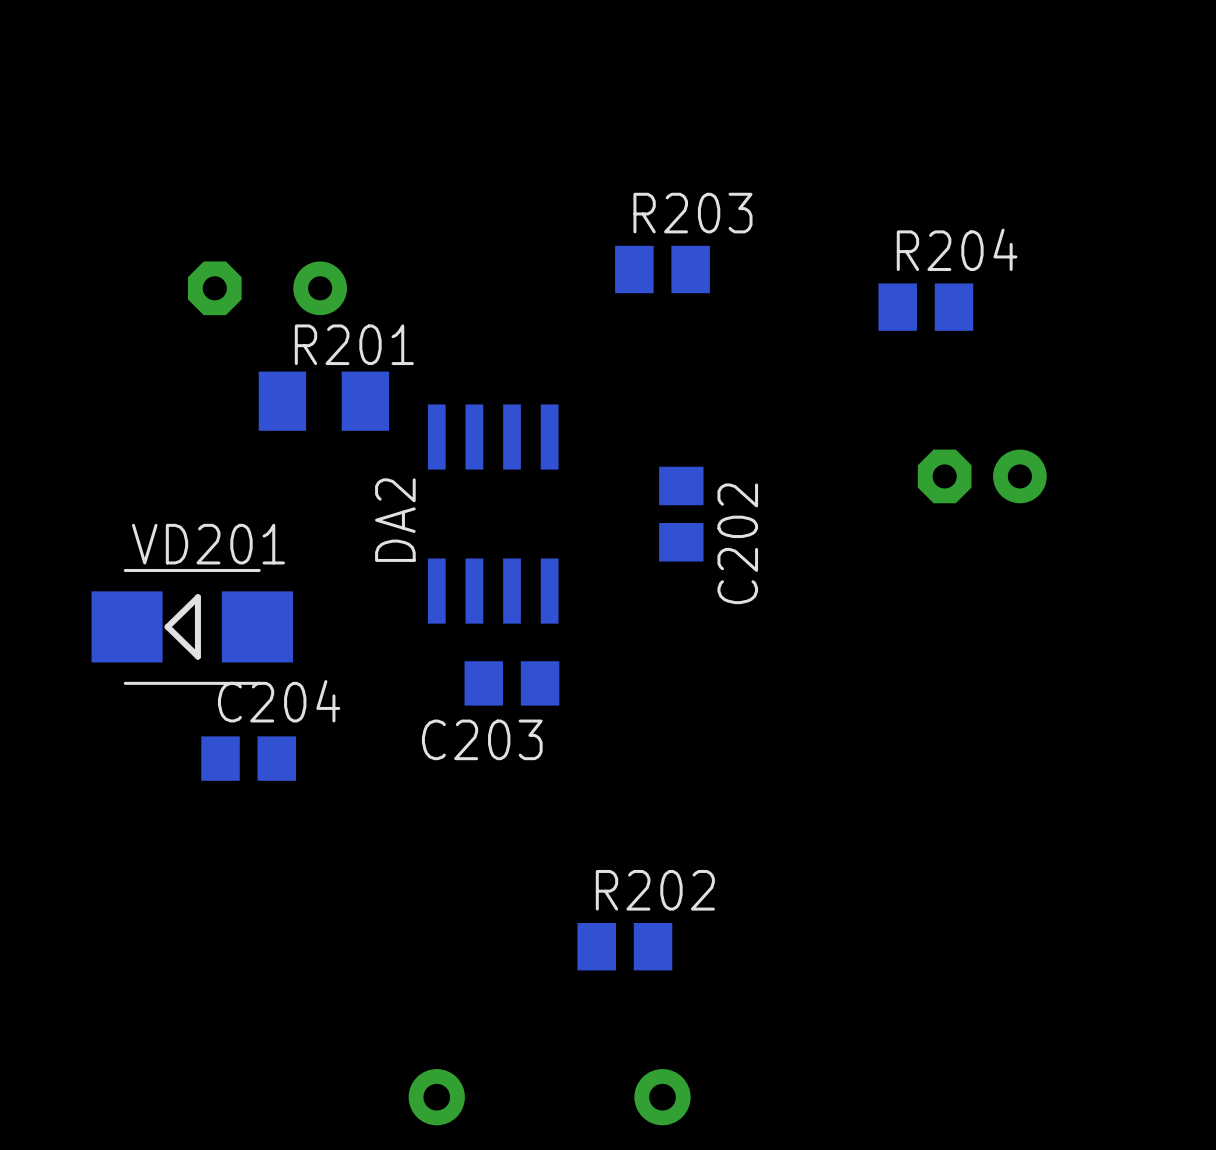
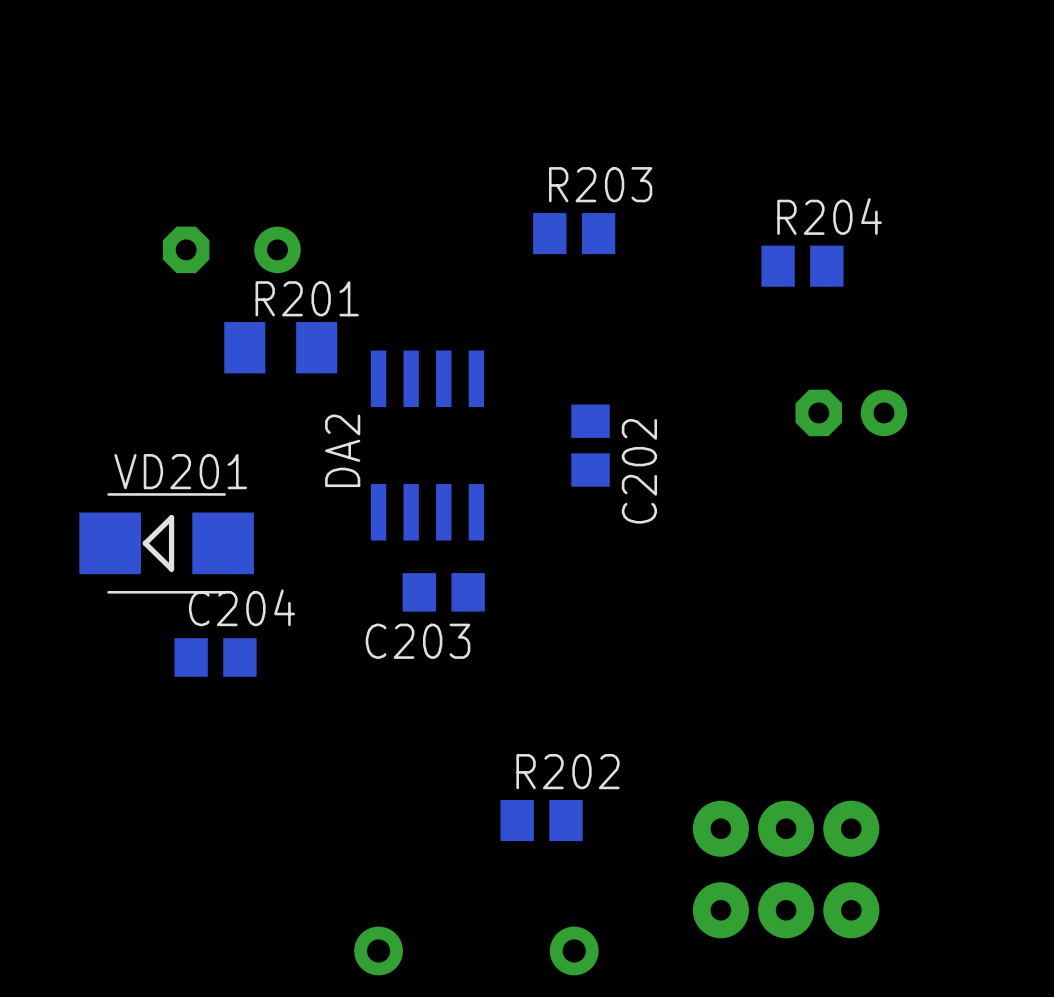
part: none -> (786, 869)

